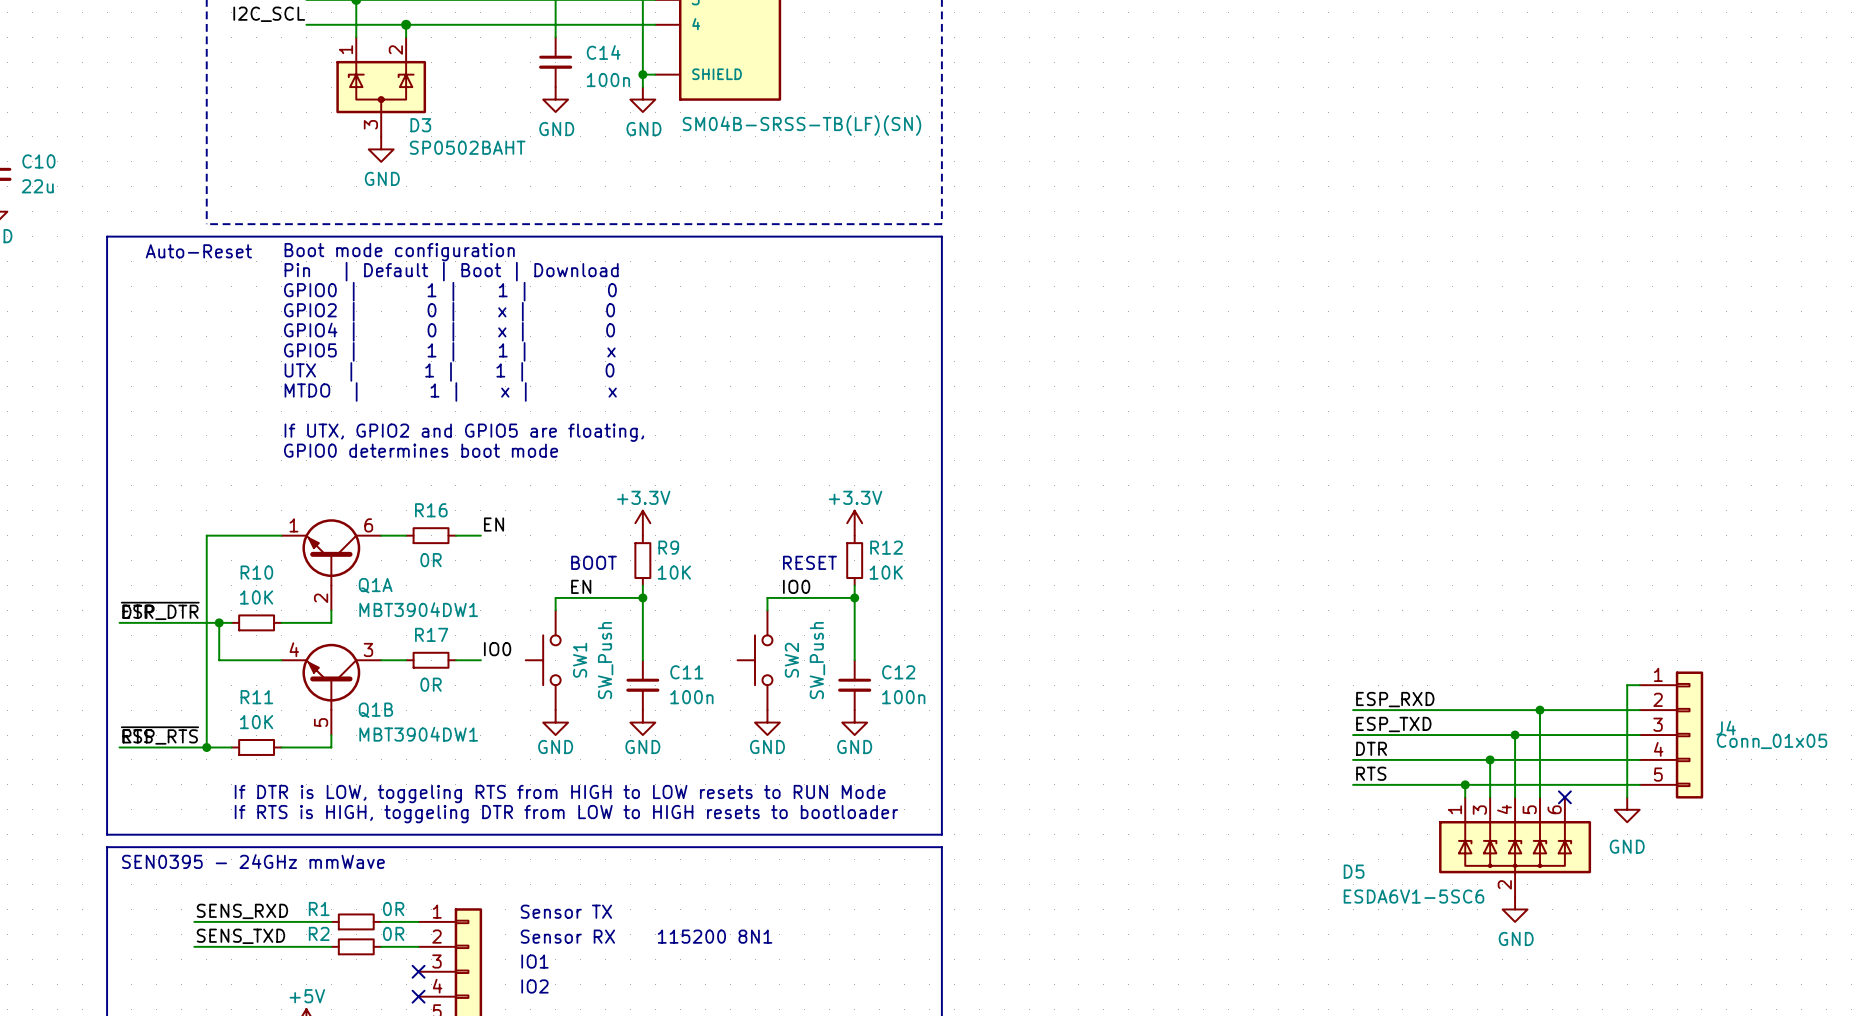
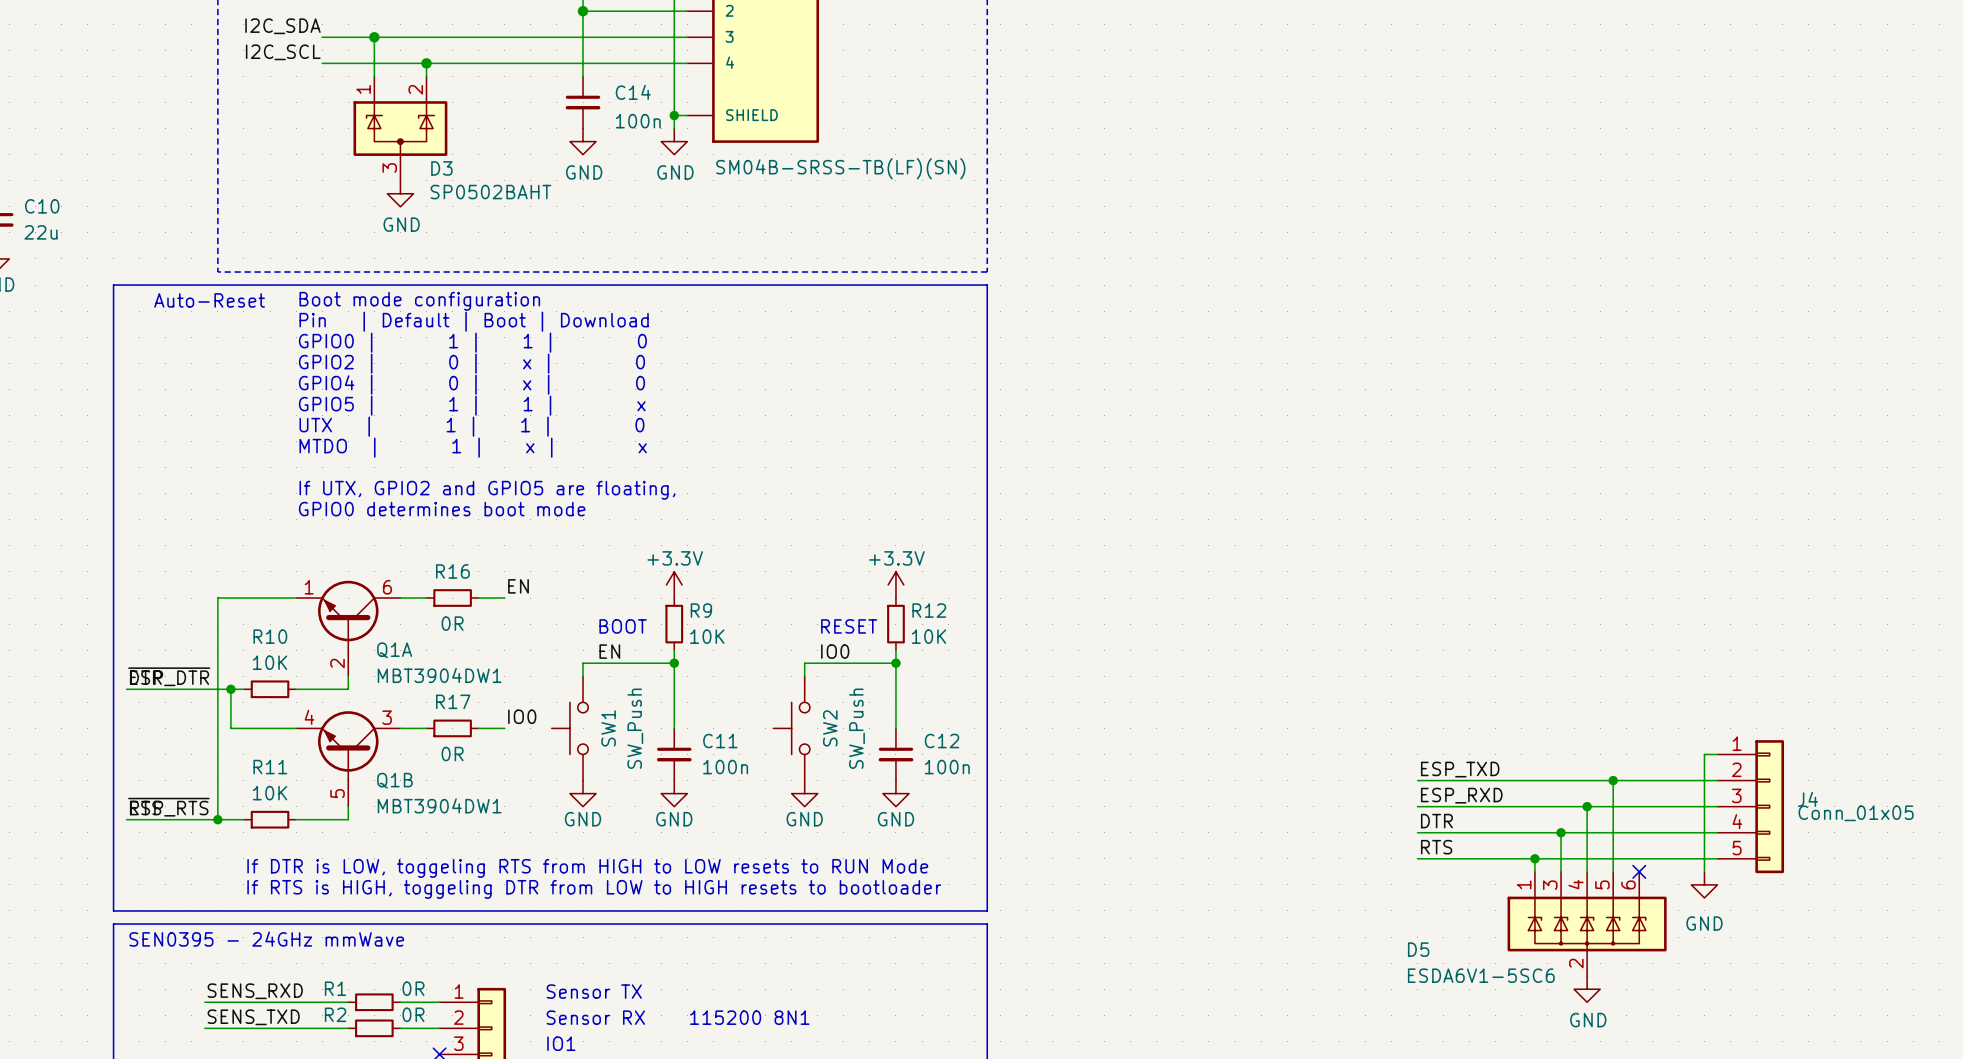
label: ESP_RXD (1395, 699) -> ESP_TXD (1460, 769)
label: ESP_TXD (1393, 724) -> ESP_RXD (1461, 795)

